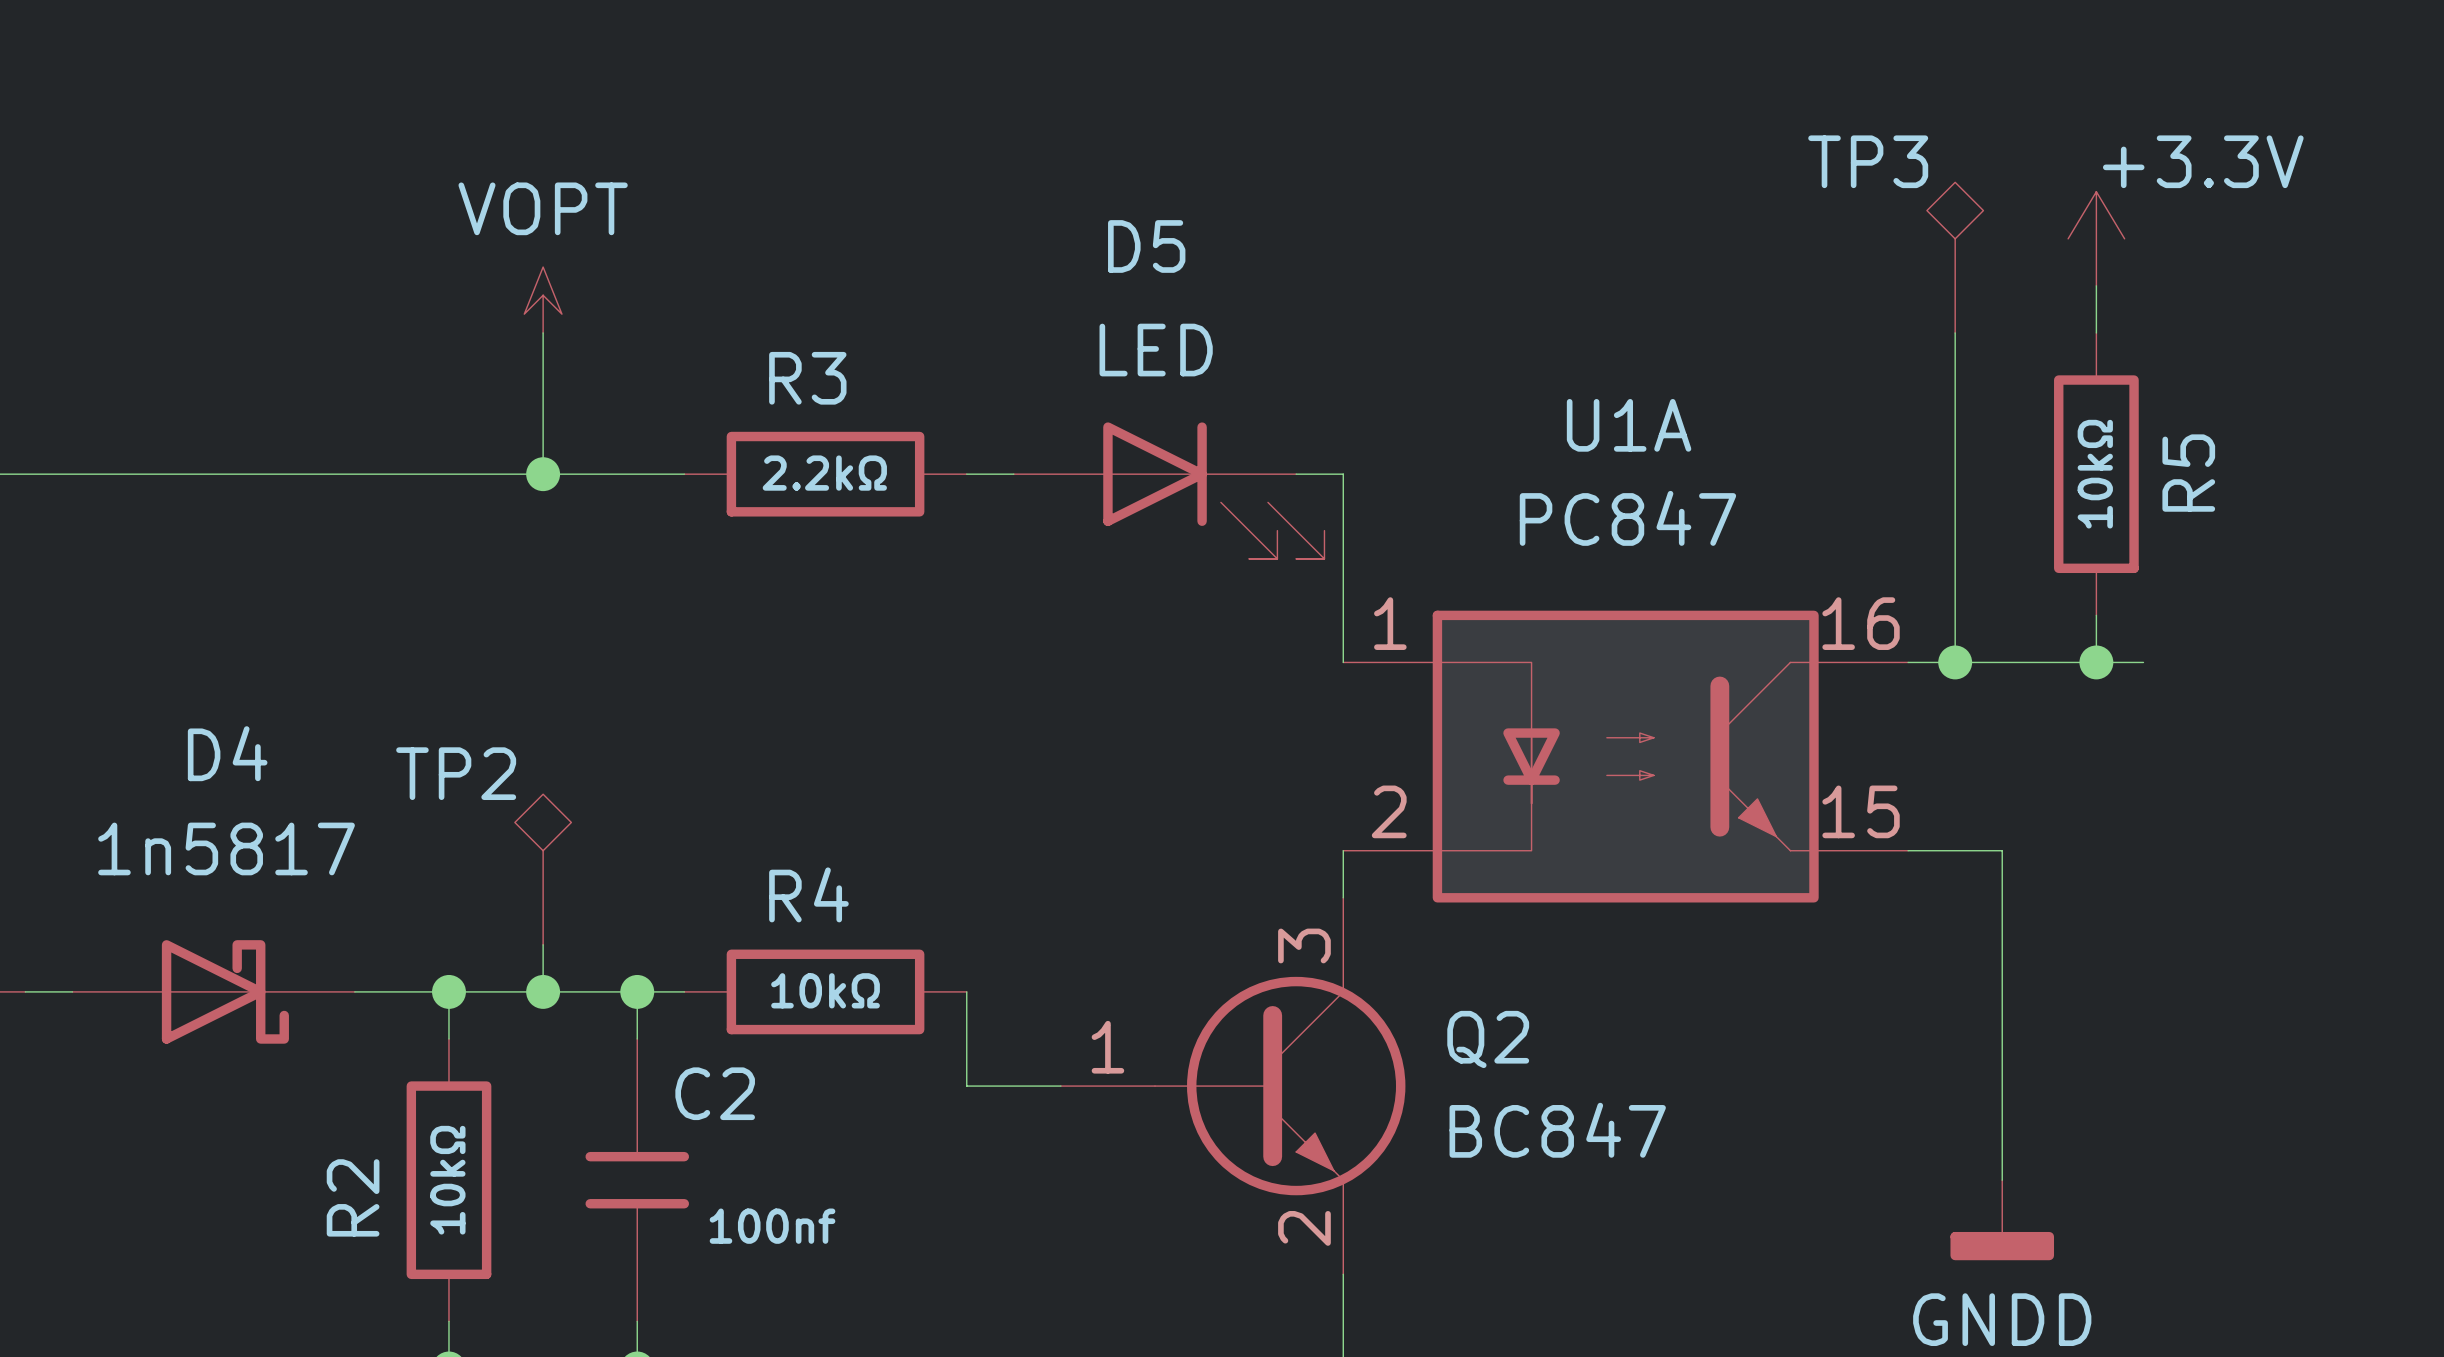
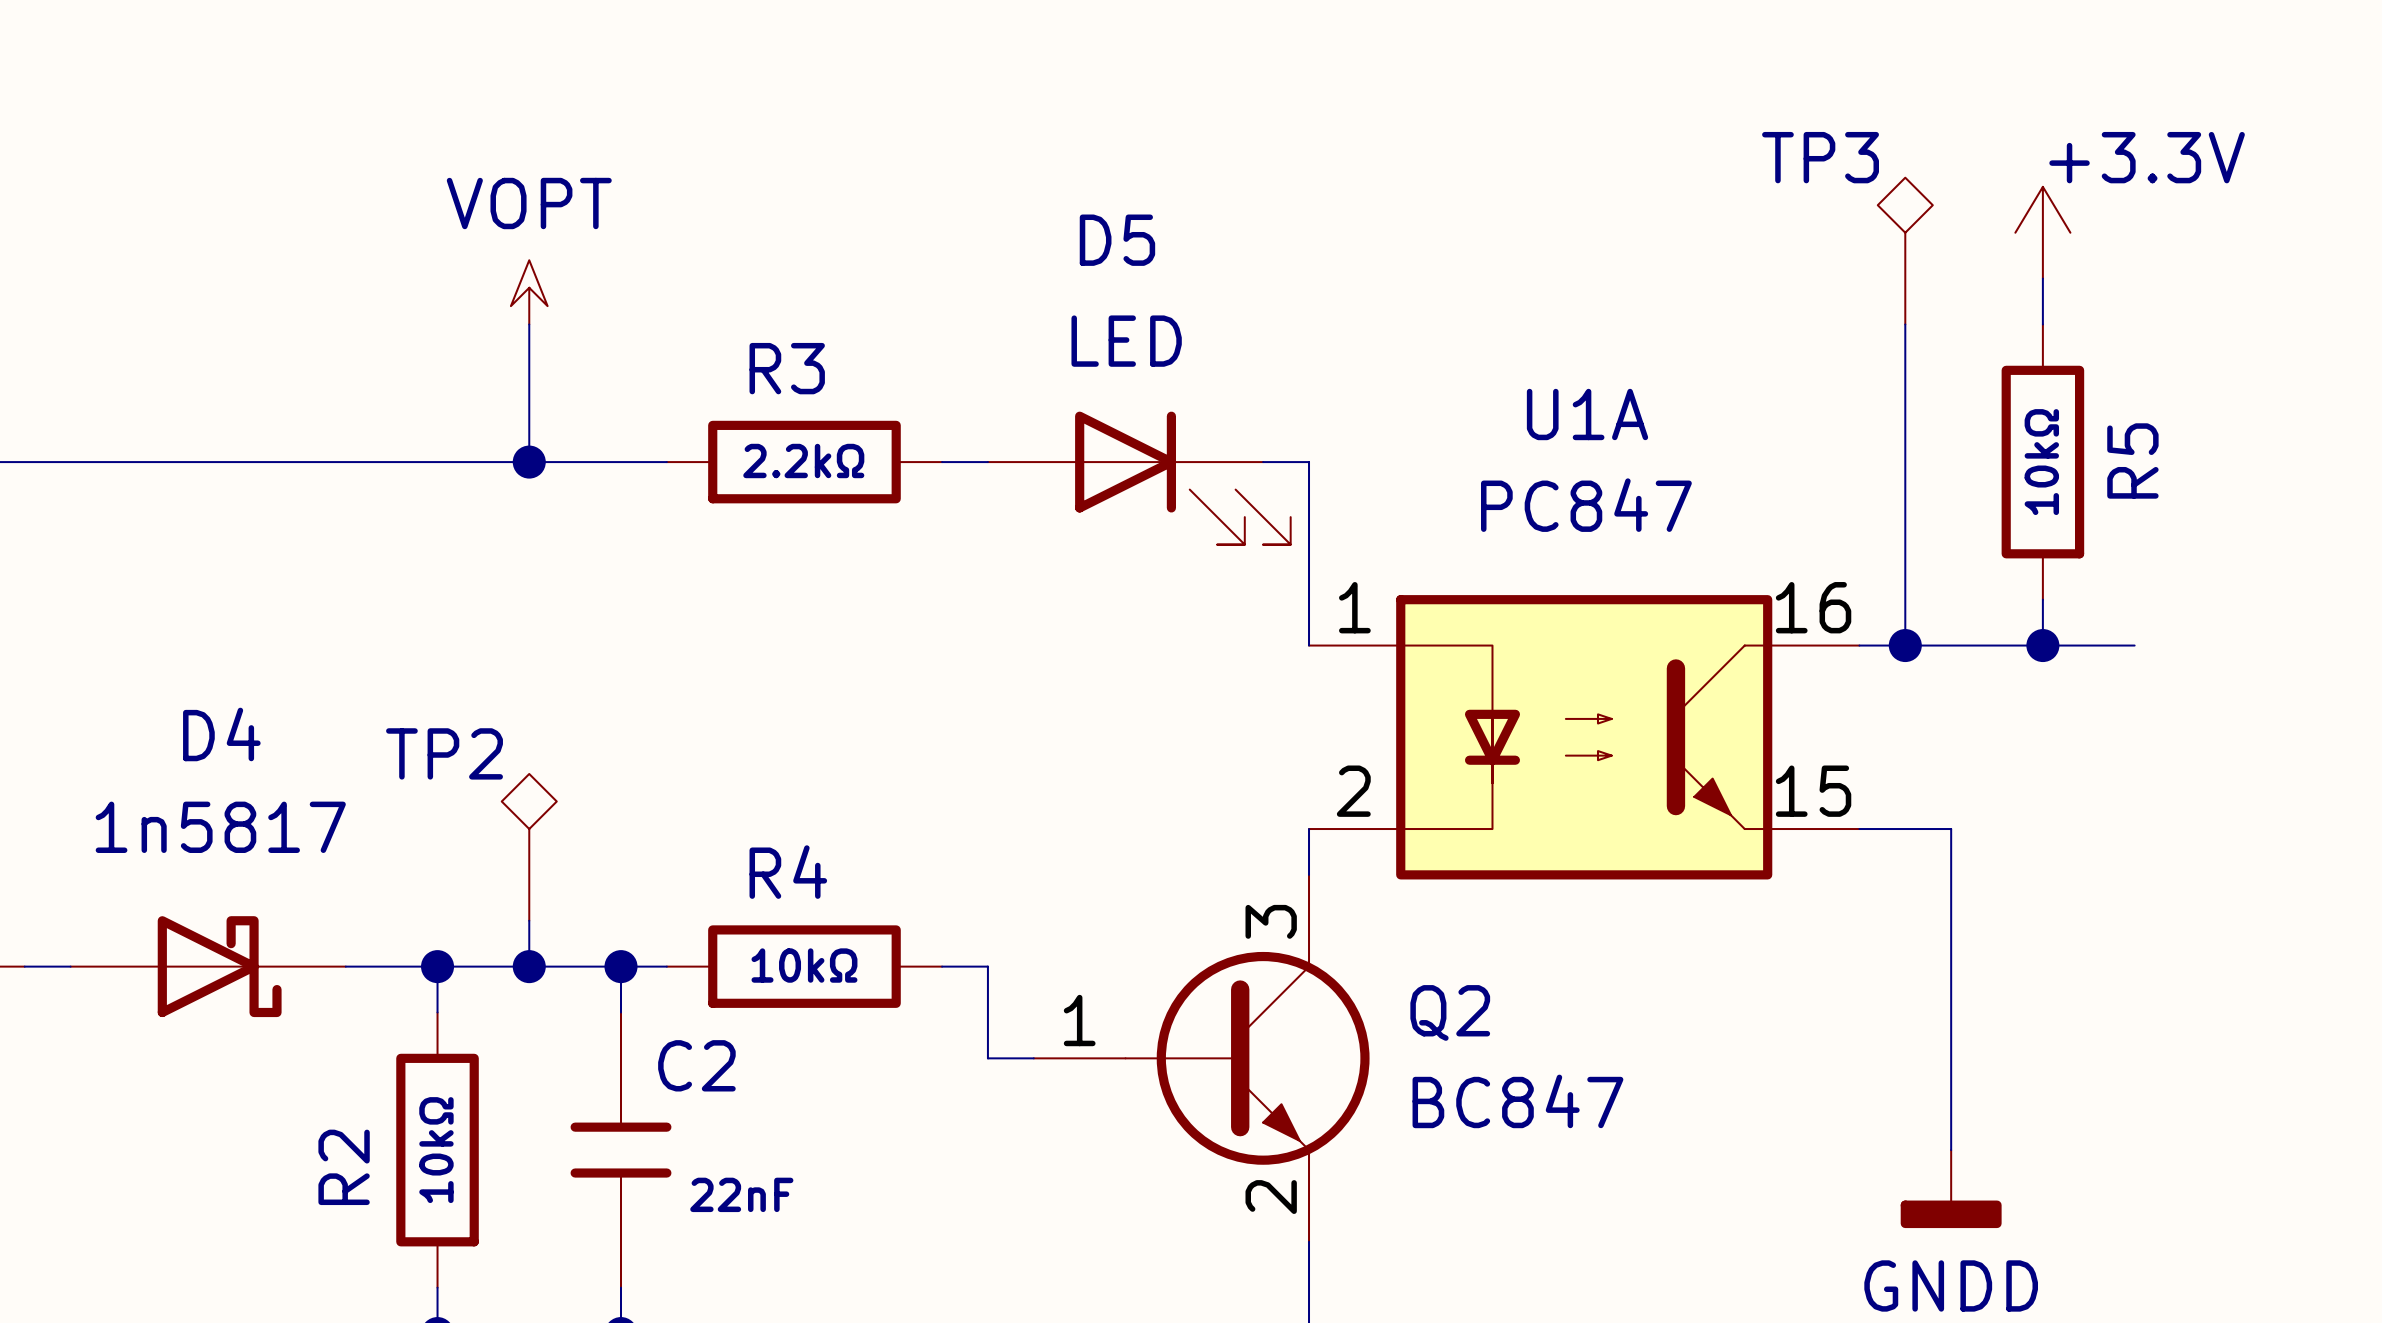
wire: none -> (2088, 645) (2134, 645)
wire: (966, 991) (966, 1086) (1013, 1086) -> (942, 966) (987, 966) (987, 1058)
C2 value: 100nf (772, 1226) -> 22nF (741, 1194)

